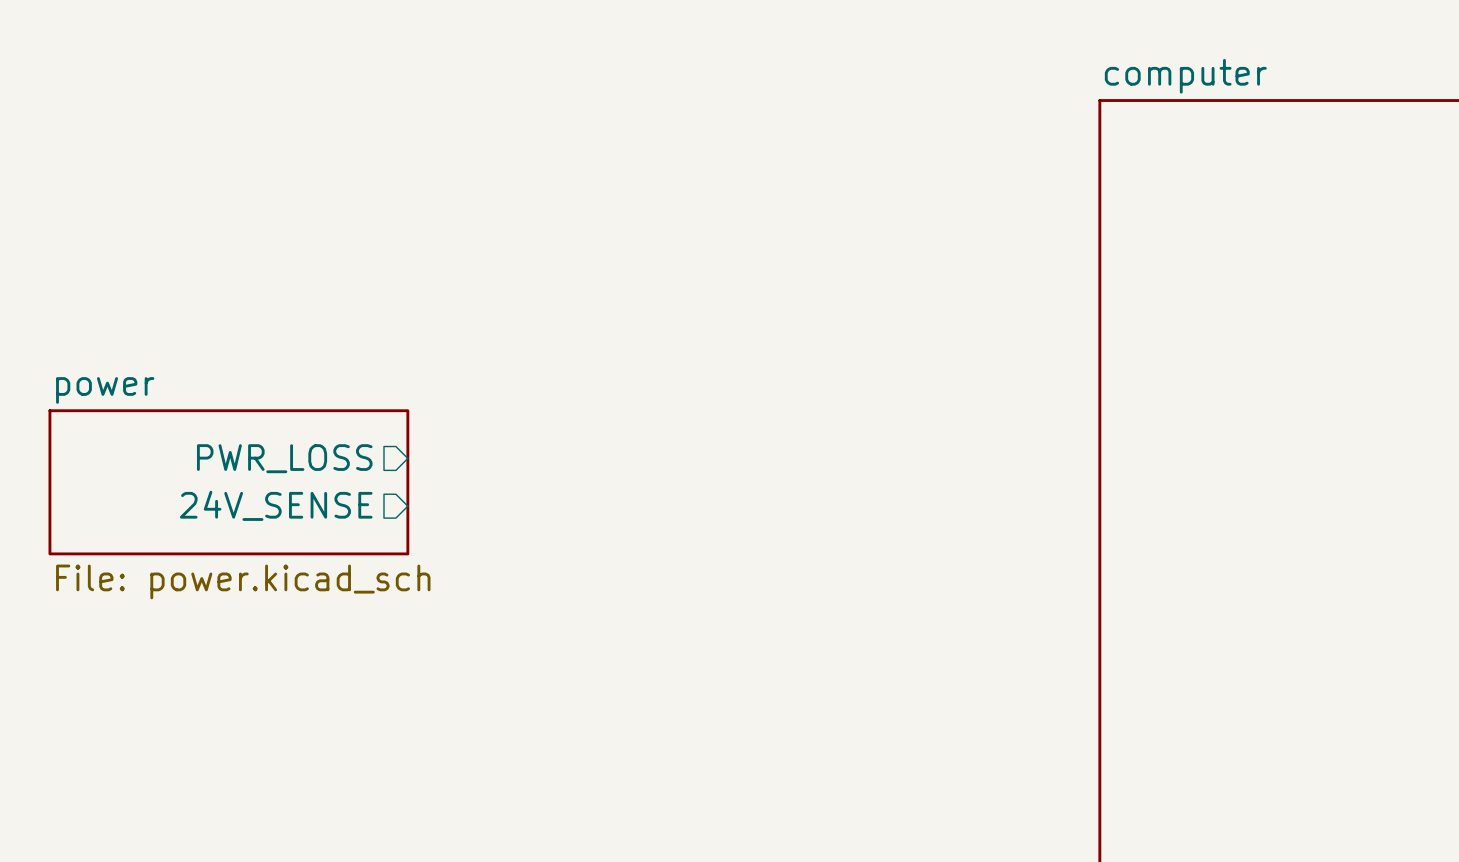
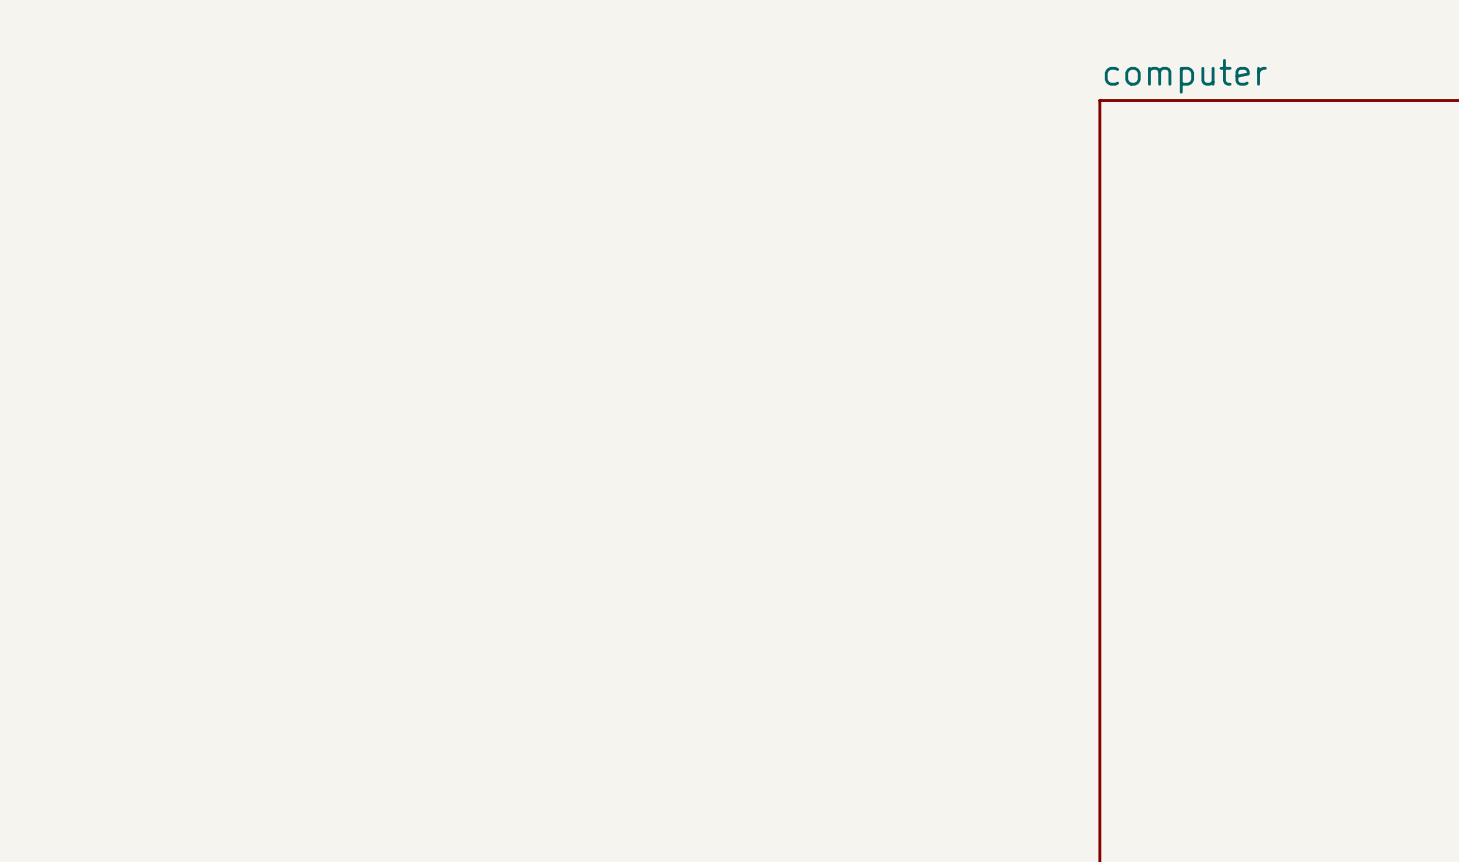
sheet pin: PWR_LOSS (284, 458) -> none
sheet power: File: power.kicad_sch (228, 482) -> none
sheet pin: 24V_SENSE (276, 505) -> none

